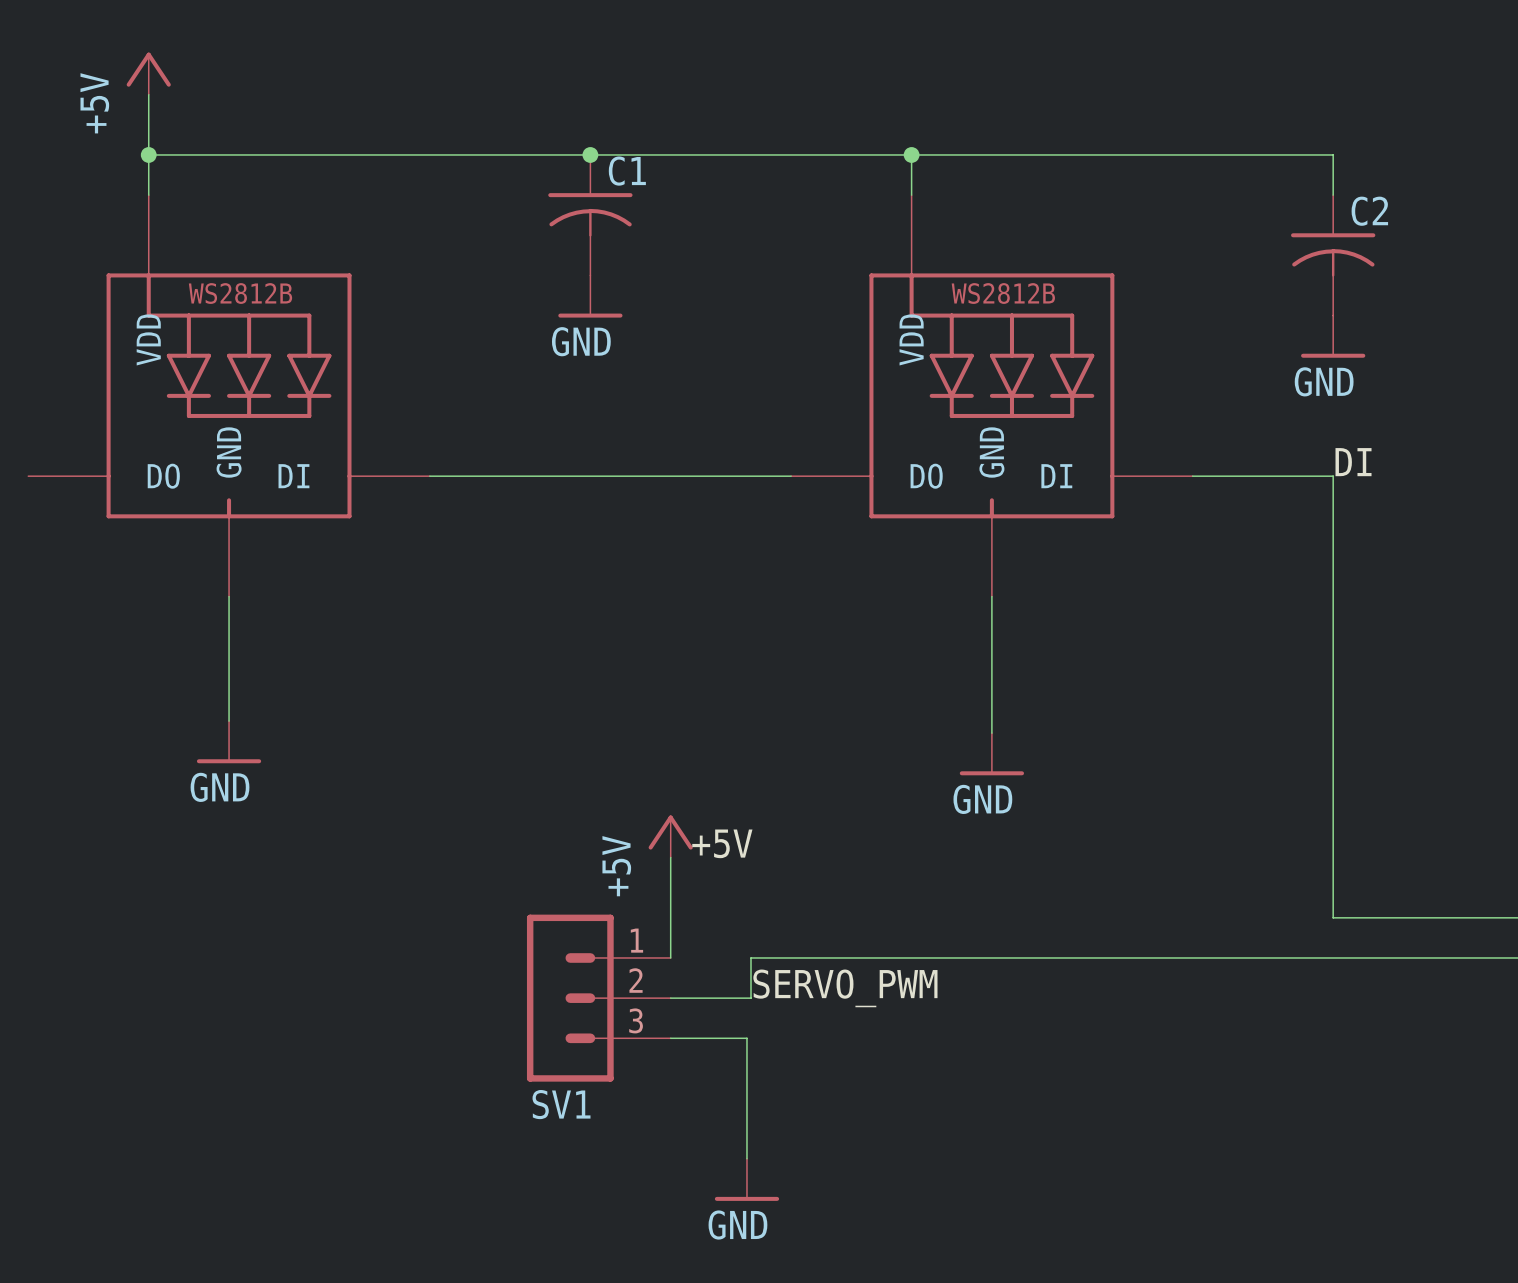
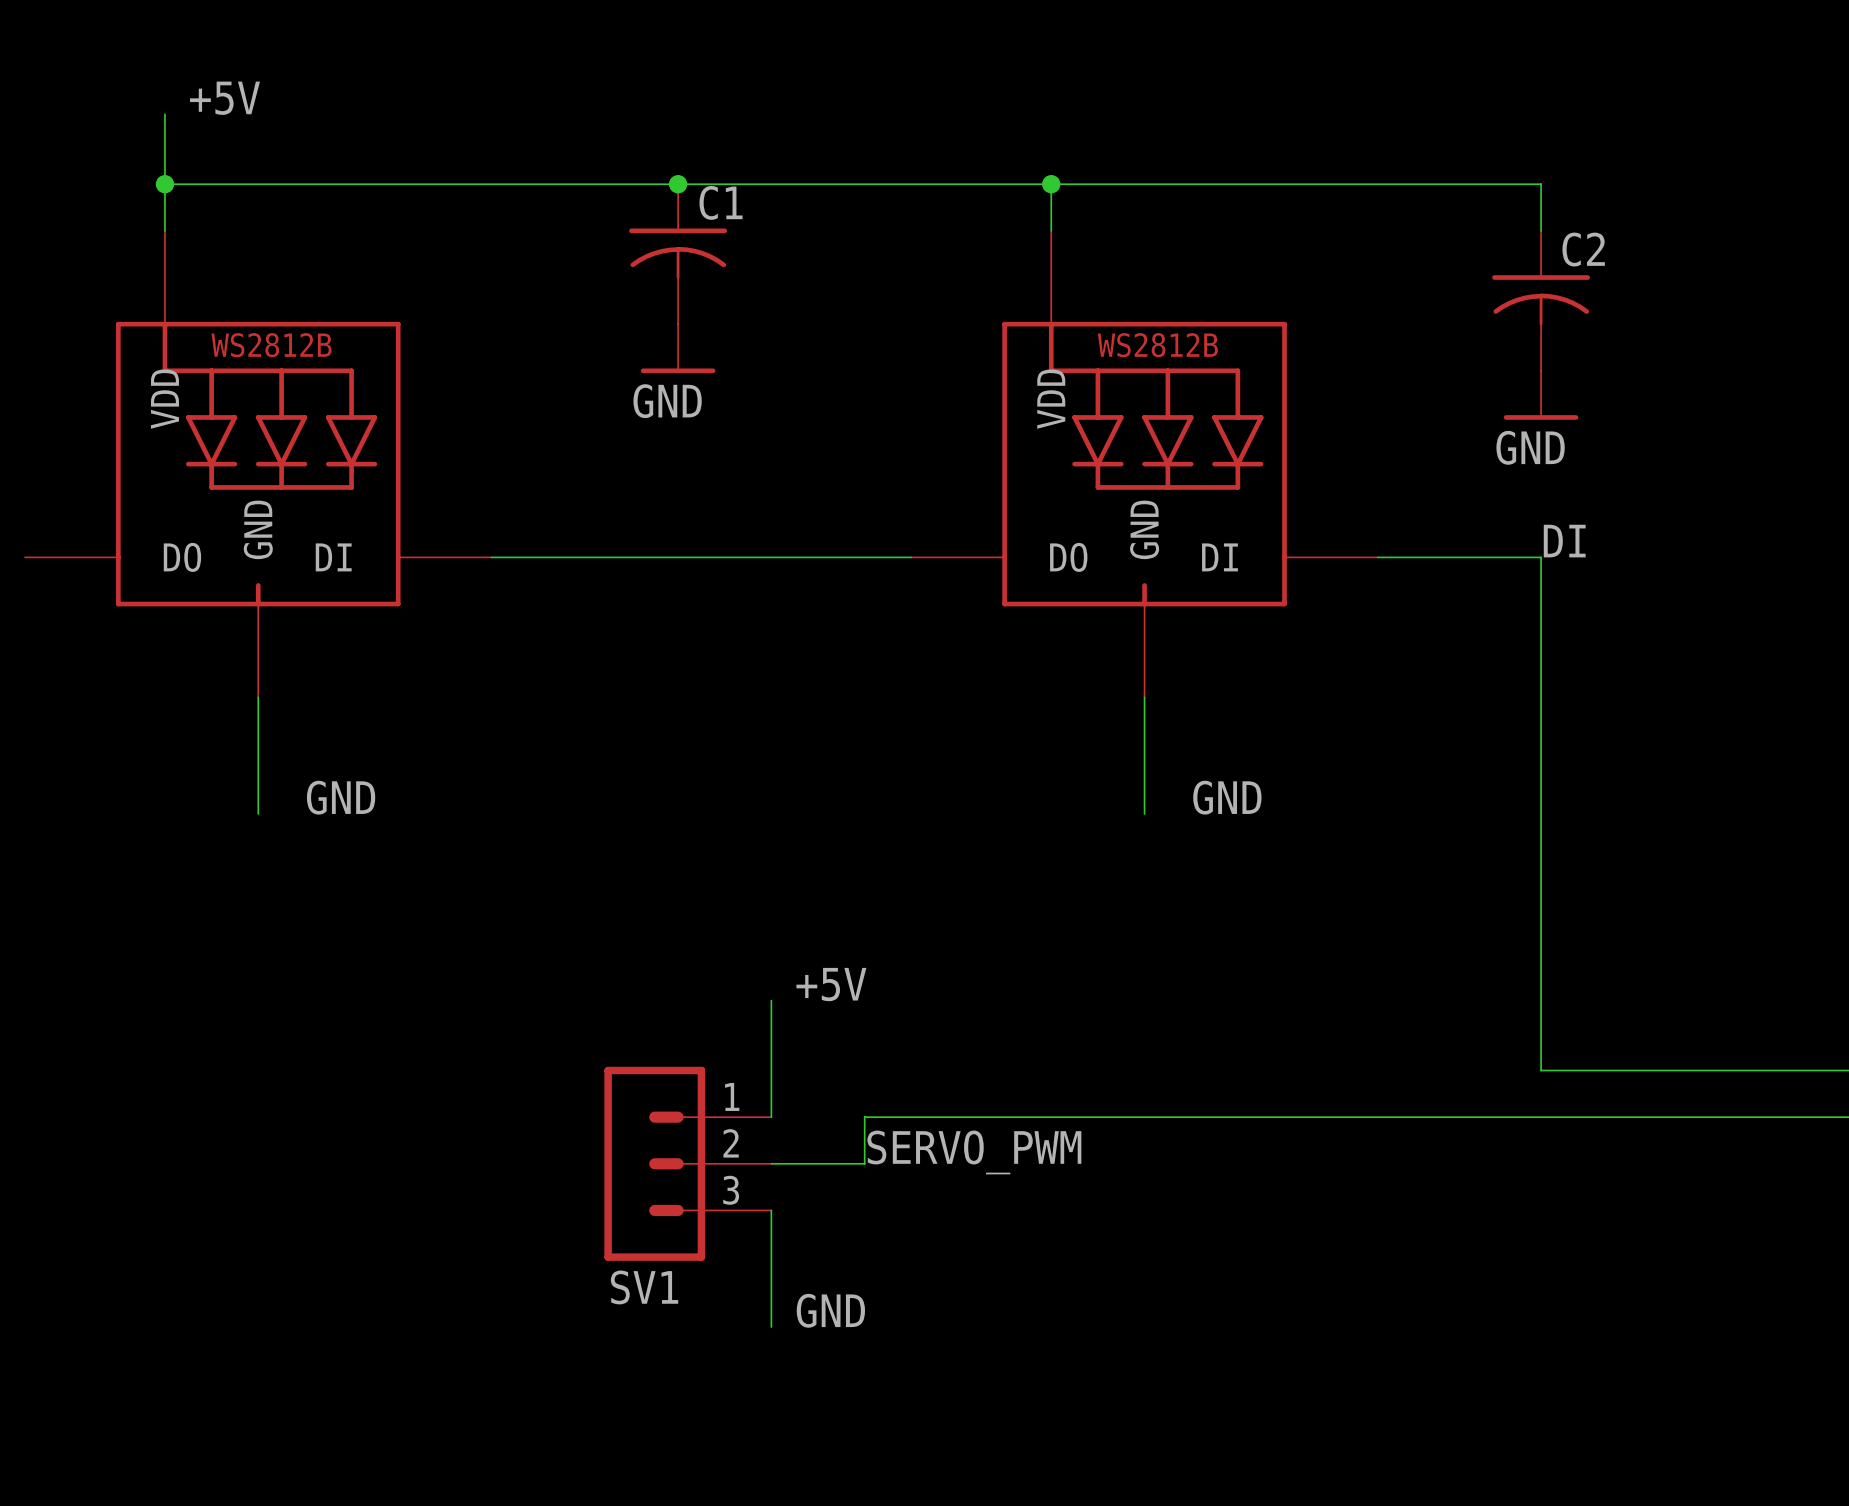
power symbol: +5V (148, 73) -> none
label: none -> +5V (225, 98)
label: none -> GND (341, 797)
label: none -> GND (1227, 797)
wire: (229, 697) (229, 721) -> none
wire: (991, 697) (991, 733) -> none
power symbol: GND (229, 742) -> none
power symbol: GND (991, 754) -> none
power symbol: +5V (670, 836) -> none
wire: (670, 1038) (746, 1038) (746, 1158) -> (771, 1210) (771, 1327)
label: none -> GND (830, 1310)
power symbol: GND (746, 1179) -> none

